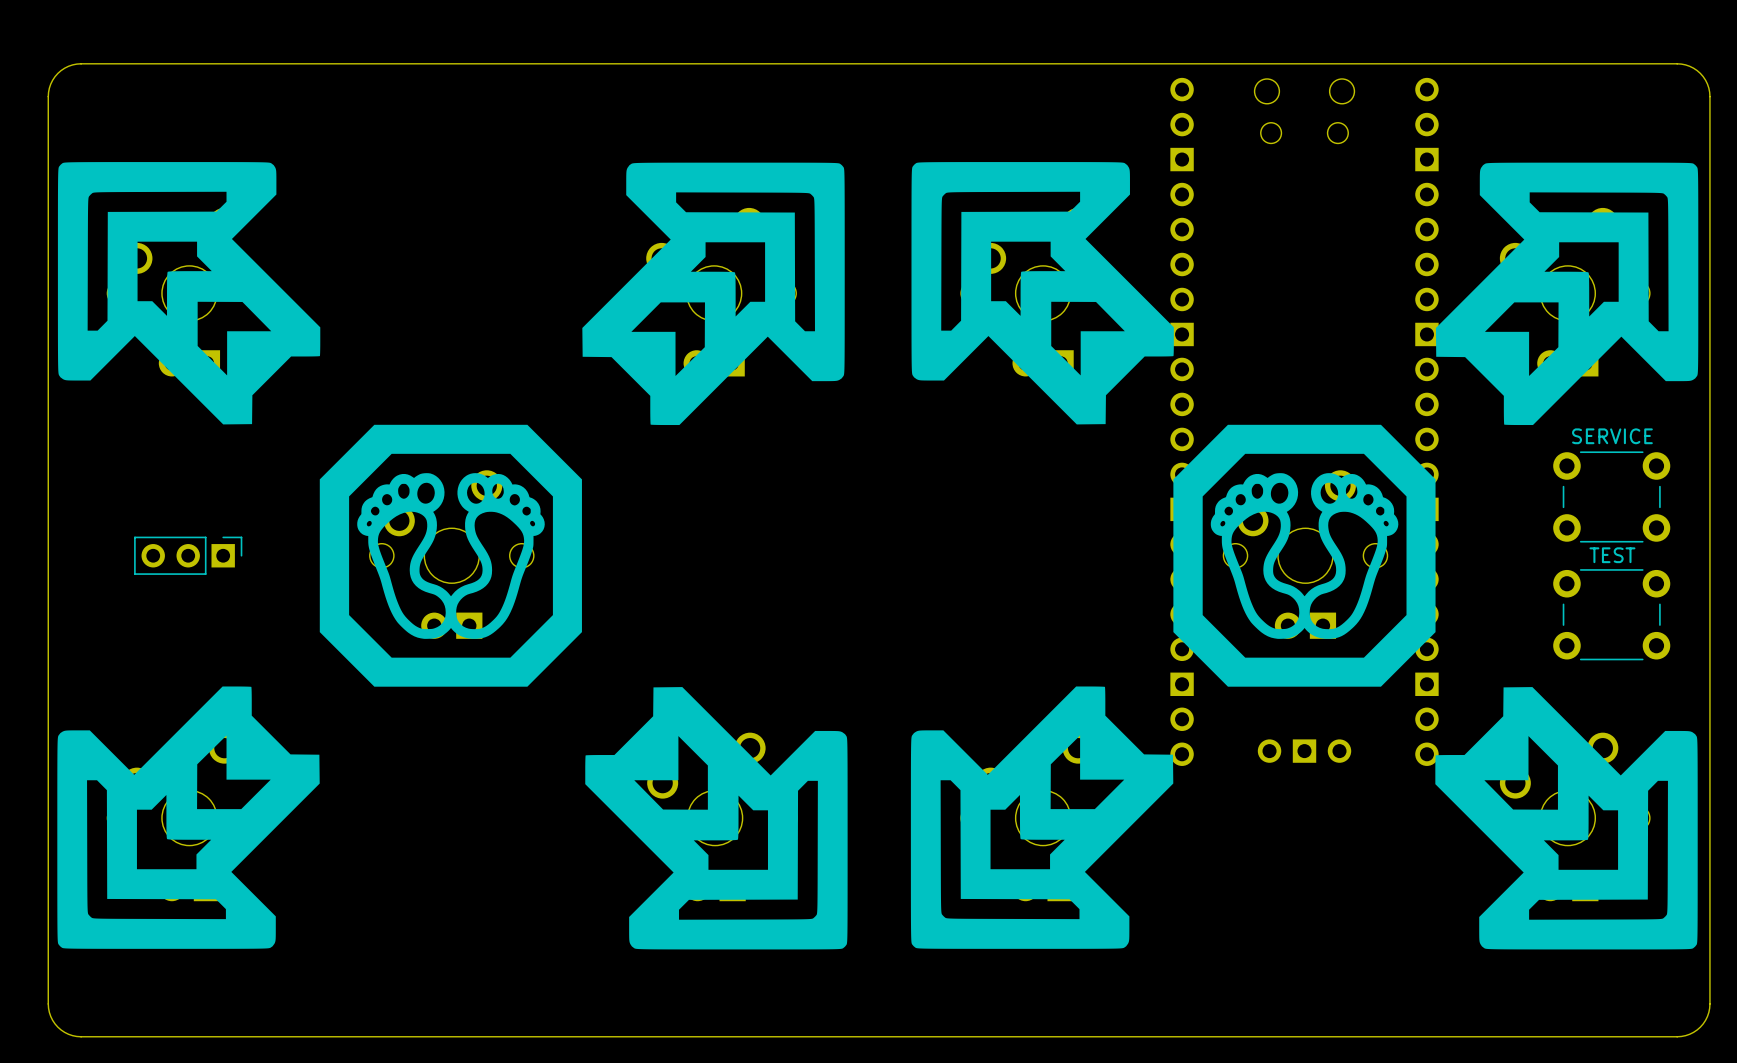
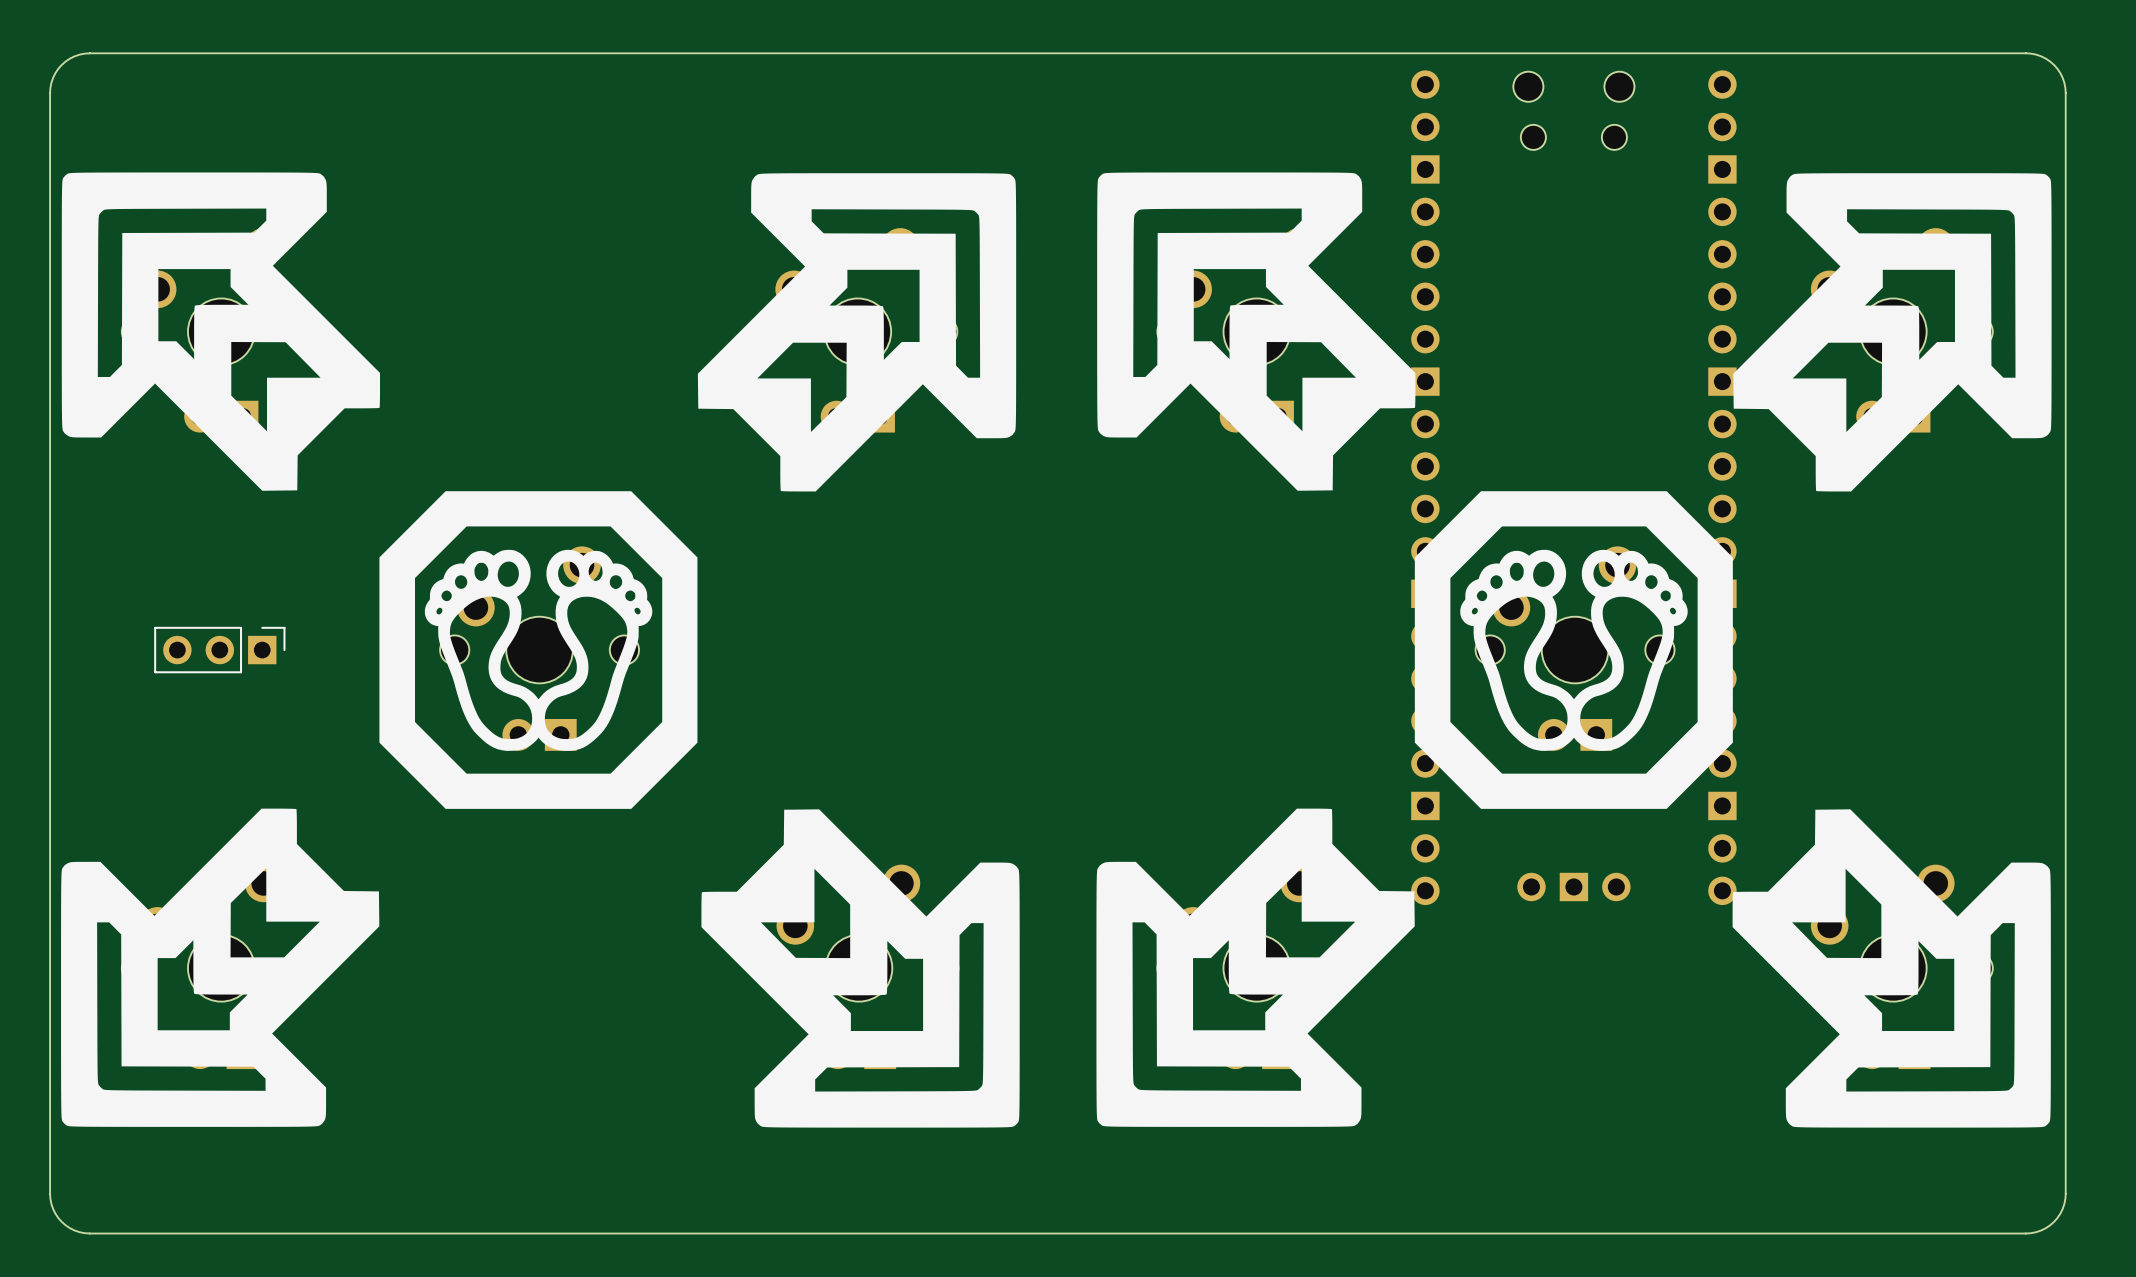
text: SERVICE (1612, 436) -> none
part: (1611, 496) -> none
text: TEST (1612, 555) -> none
part: (1611, 614) -> none

